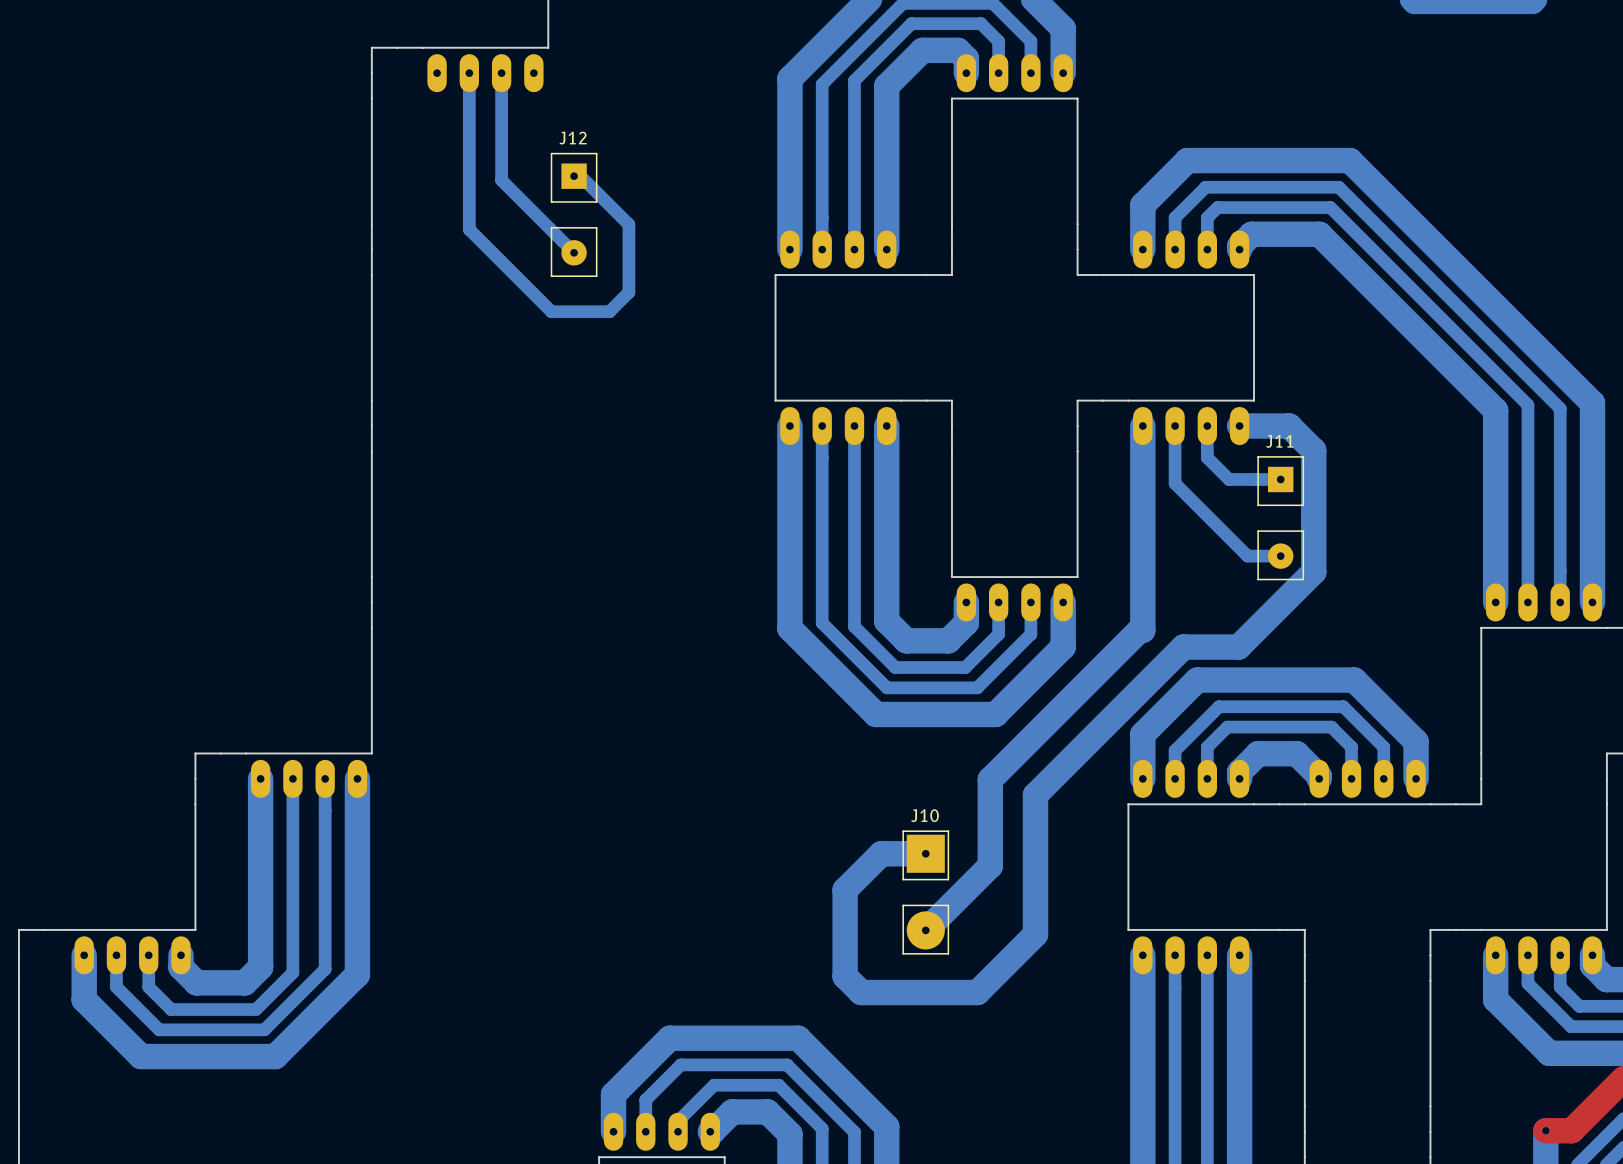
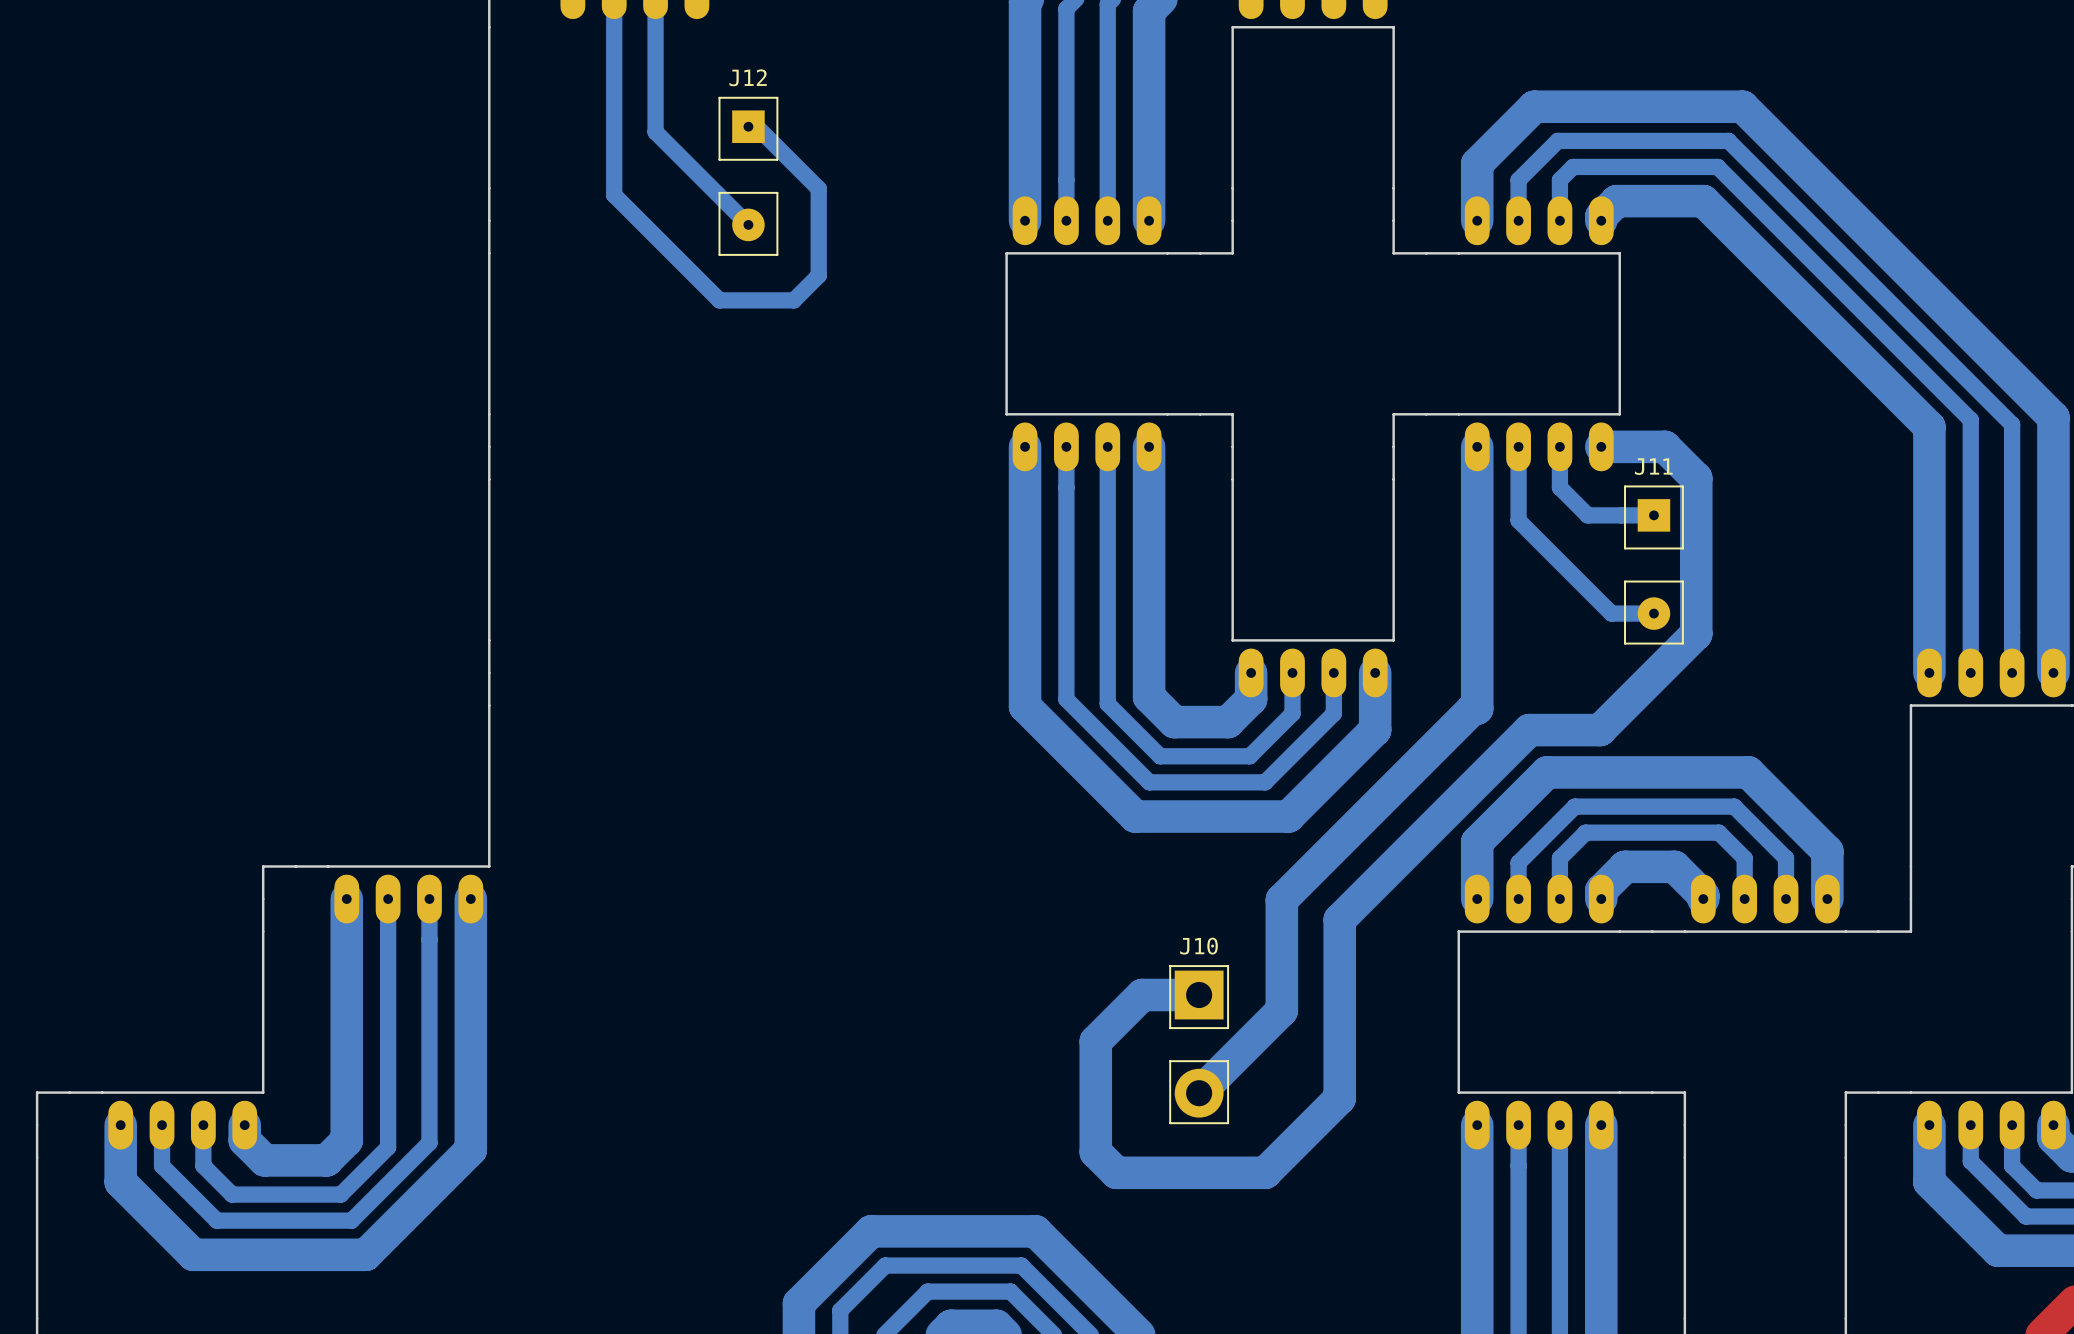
J10 footprint: [902, 830, 950, 955] -> [1169, 965, 1230, 1125]

